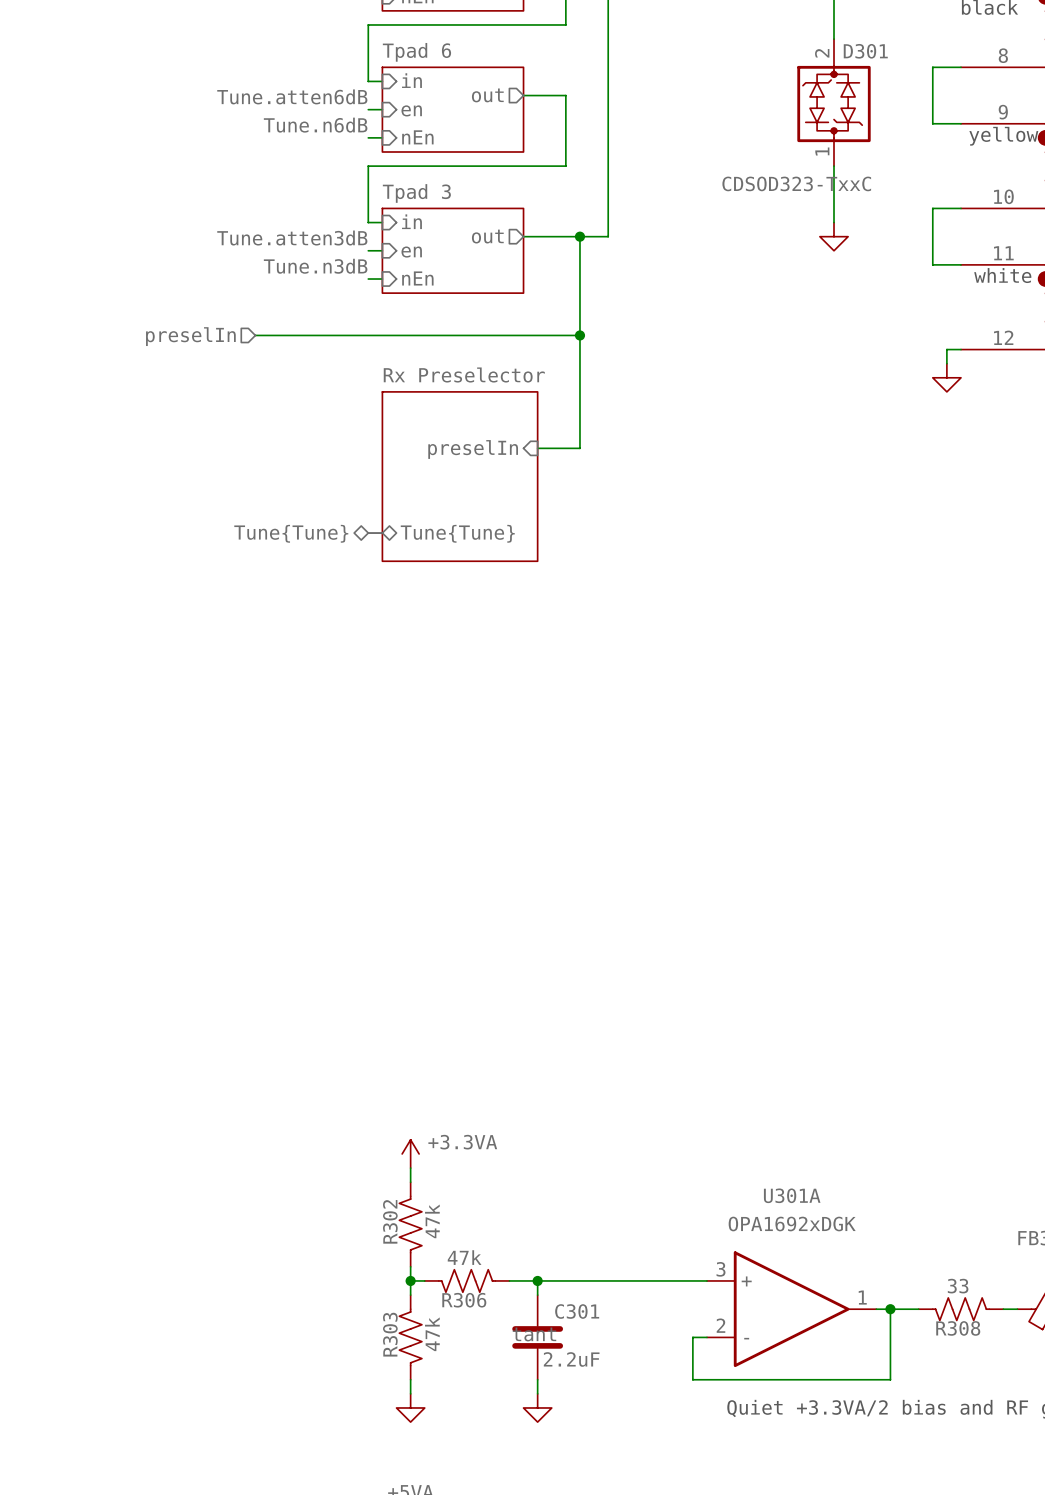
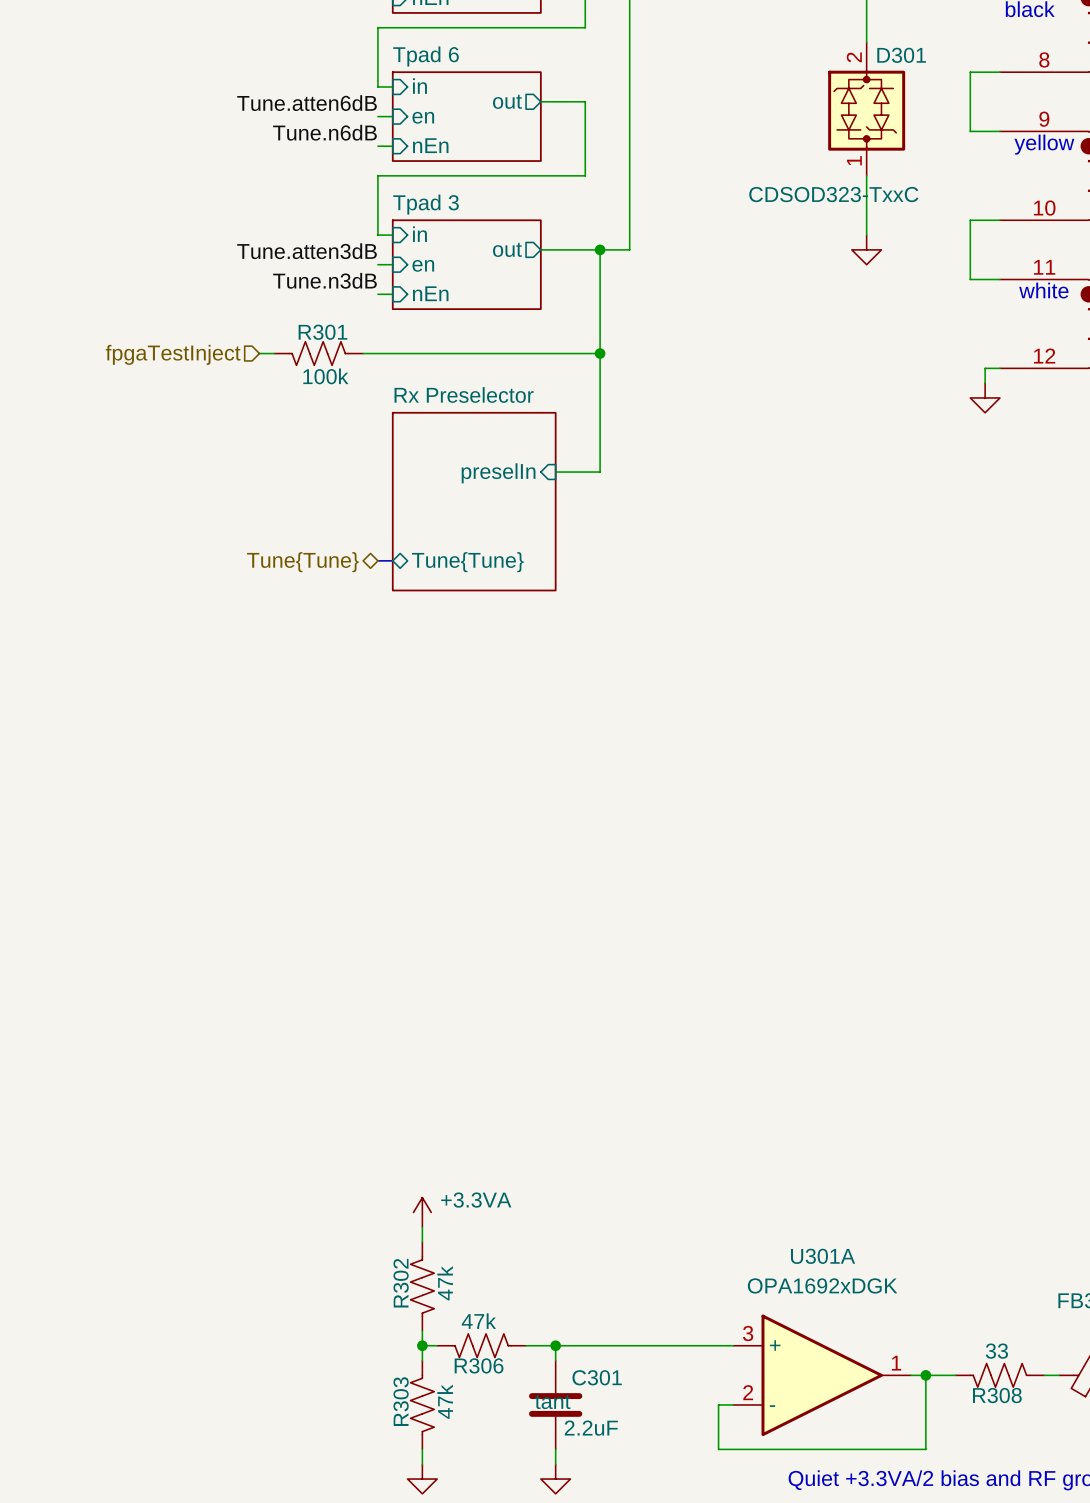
R301: none -> 100k (318, 353)
hierarchical label: preselIn (190, 336) -> fpgaTestInject (173, 354)

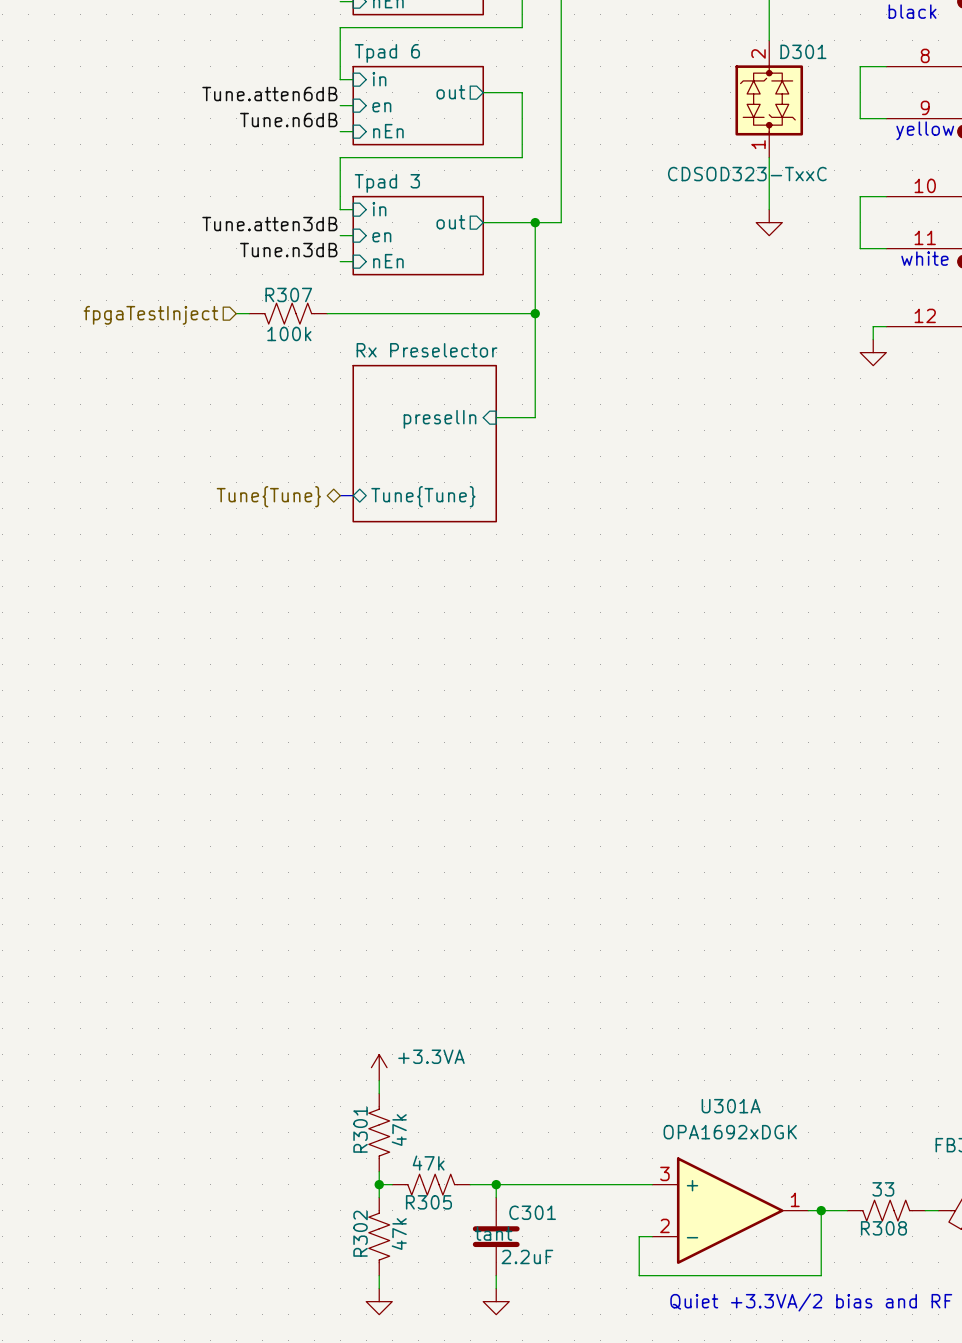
R301 name: R301 (322, 332) -> R307 (288, 294)
R302 name: R302 (401, 1283) -> R301 (360, 1129)
R306 name: R306 (479, 1365) -> R305 (428, 1202)
R303 name: R303 (401, 1401) -> R302 (360, 1233)

